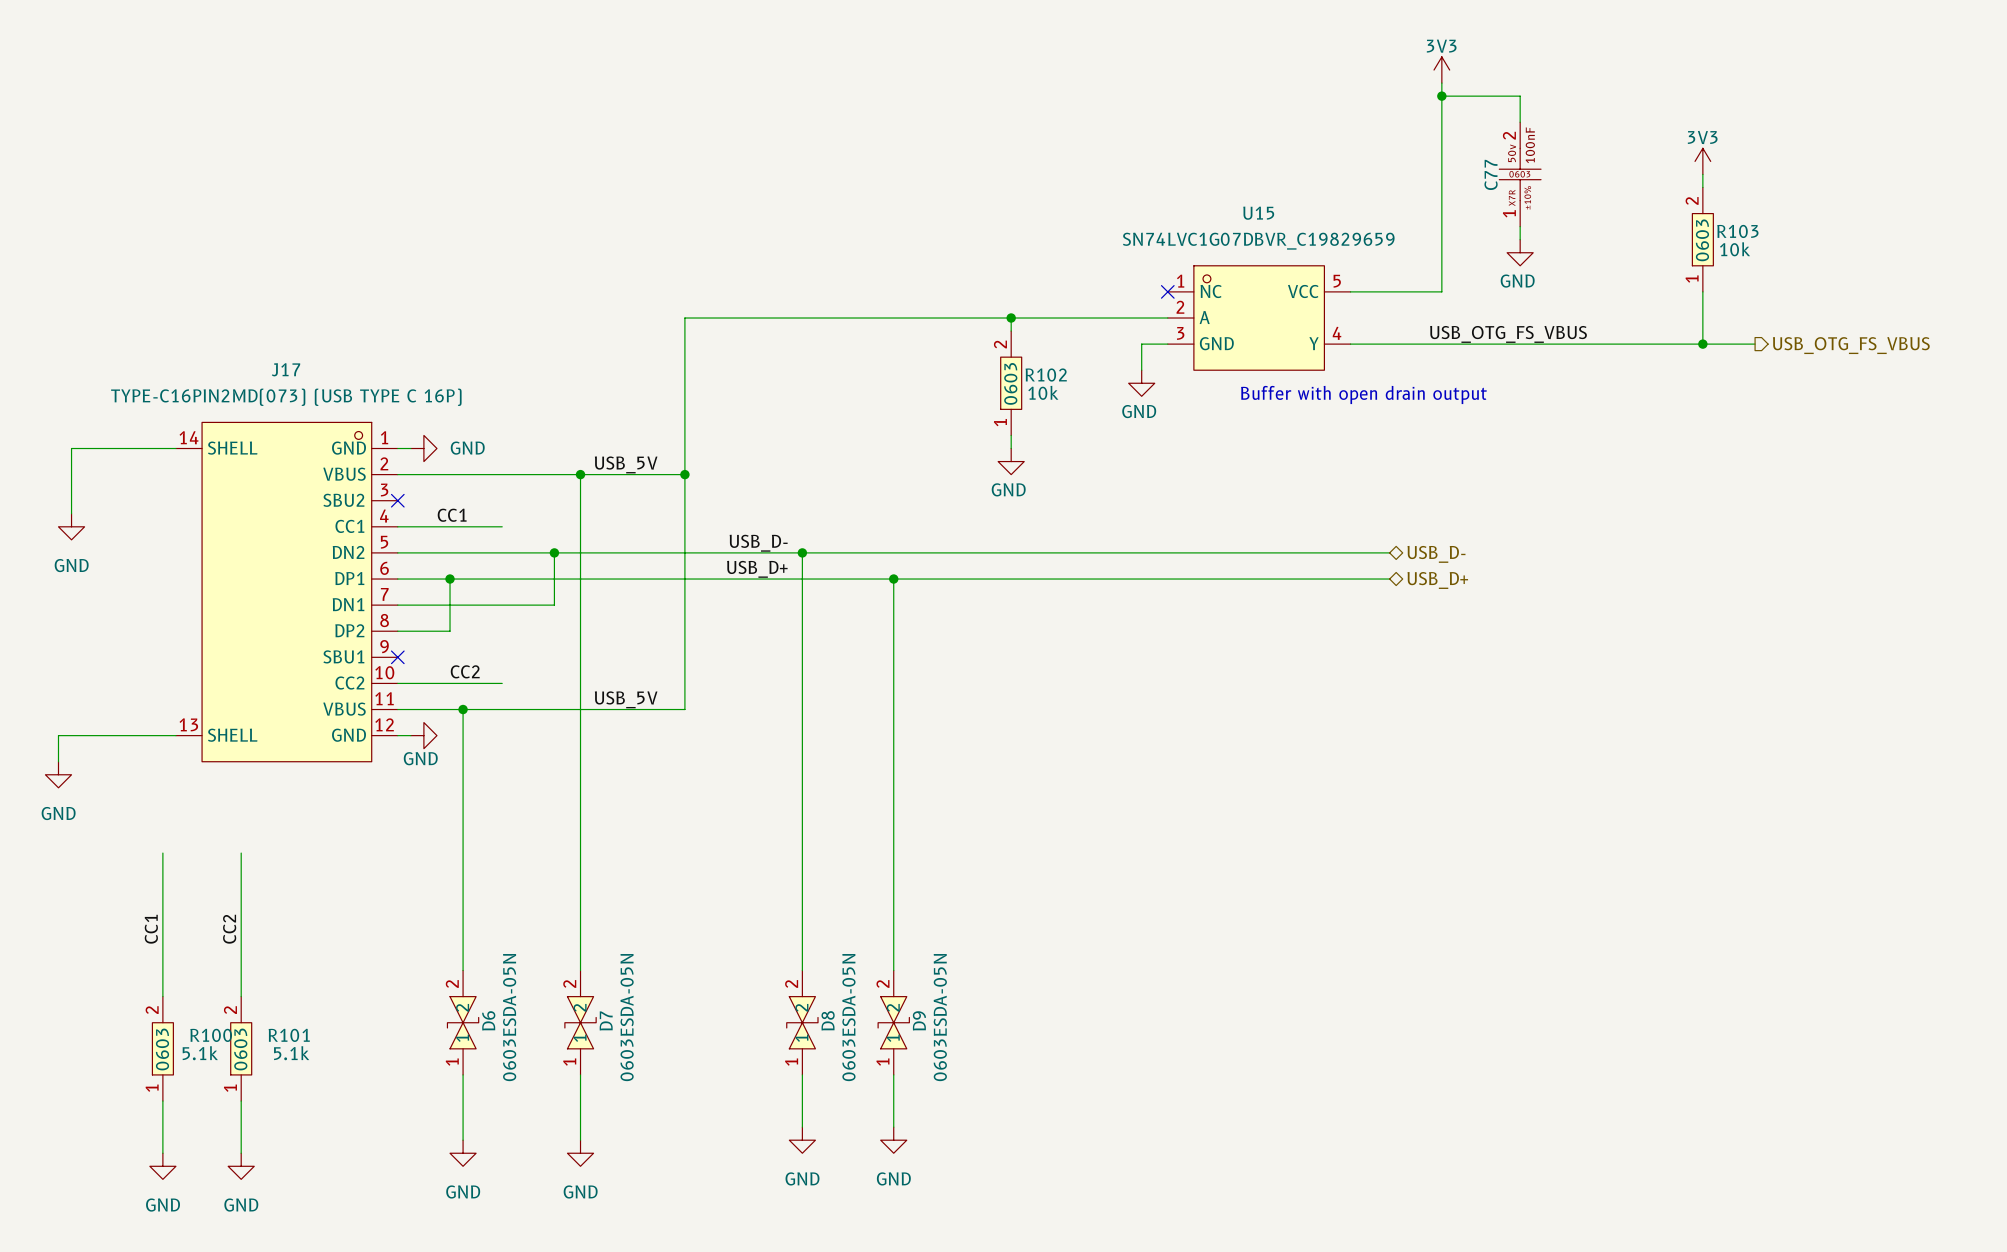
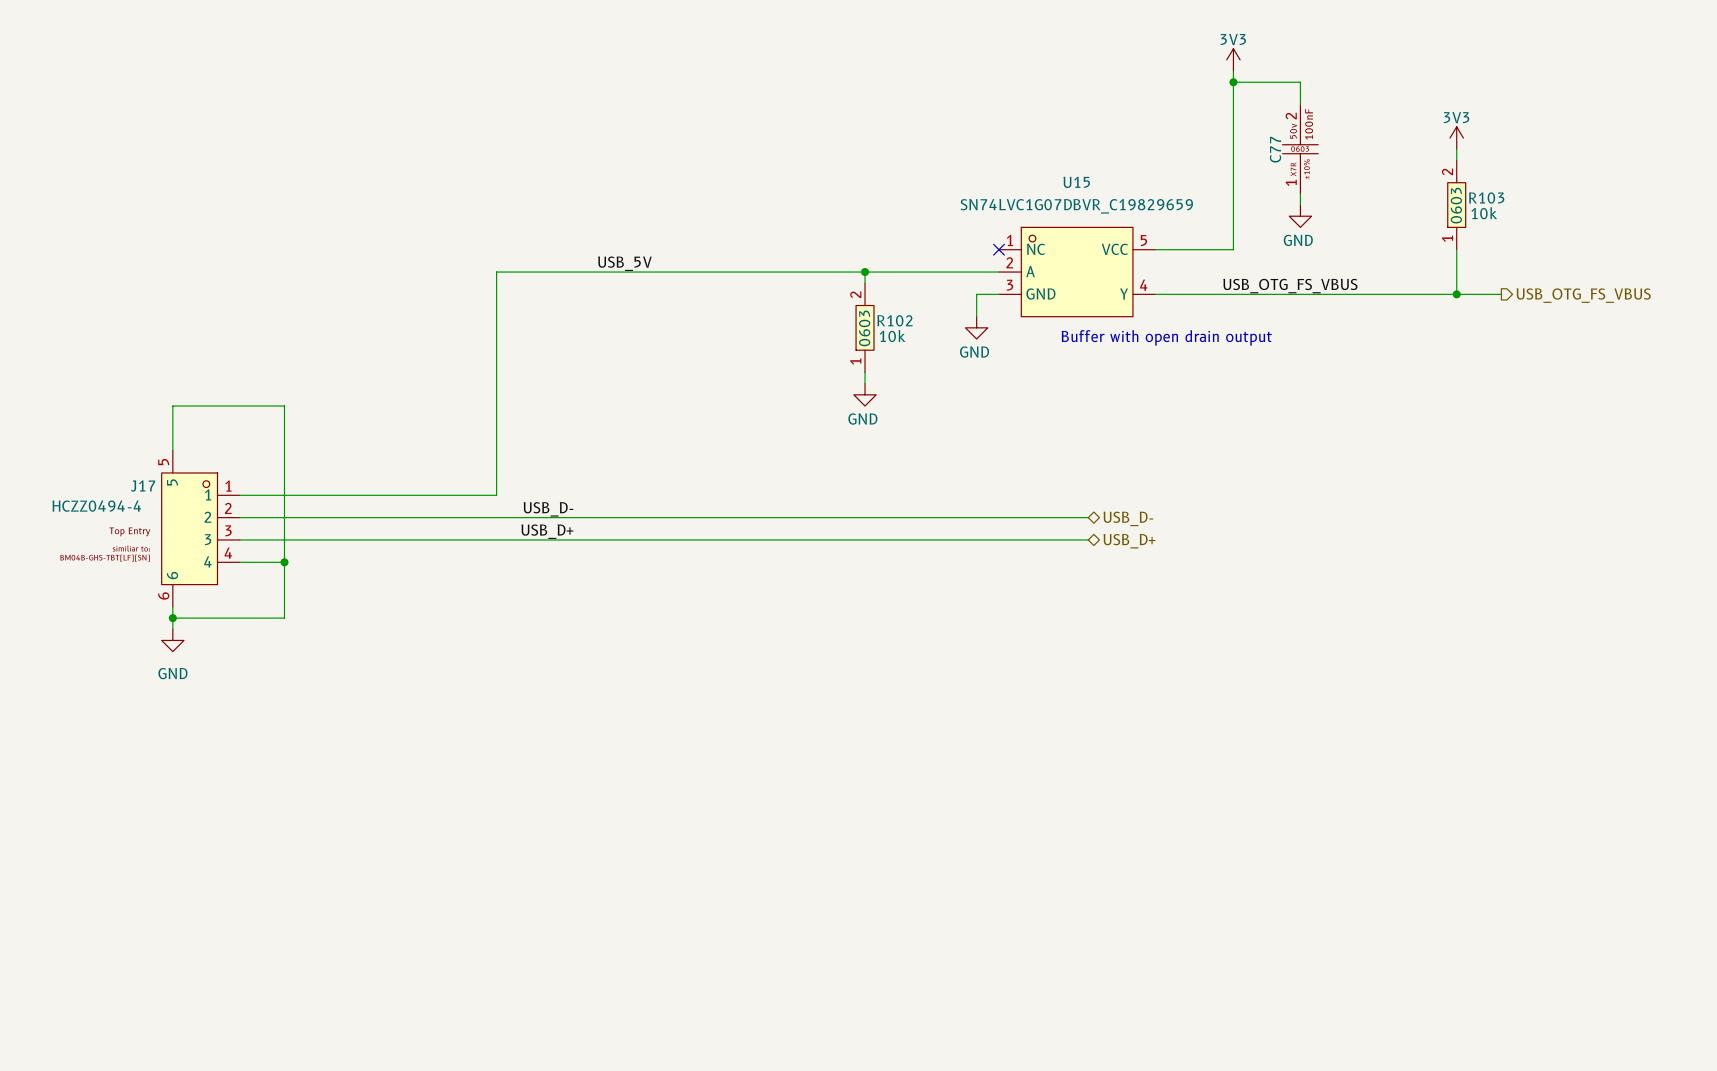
wire: (684, 318) (684, 709) (397, 709) -> (585, 272) (496, 272) (496, 406)
J17 name position: J17 (286, 369) -> J17 (143, 486)
J17 value: TYPE-C16PIN2MD(073) (USB TYPE C 16P) (286, 397) -> HCZZ0494-4 (96, 506)
J17 symbol: [175, 422, 398, 762] -> [161, 450, 240, 607]
wire: (175, 448) (71, 448) (71, 513) -> none
wire: (397, 448) (410, 448) -> none
power symbol: GND (423, 448) -> none
label position: USB_5V (626, 464) -> USB_5V (624, 263)
wire: (397, 474) (684, 474) -> none
junction: (580, 474) -> none
junction: (684, 474) -> none
no-connect mark: (397, 500) -> none
label: CC1 (452, 515) -> none
power symbol: GND (71, 526) -> none
wire: (397, 526) (502, 526) -> none
label position: USB_D- (758, 543) -> USB_D- (548, 509)
wire: (397, 552) (1389, 552) -> none
wire: (554, 552) (554, 605) -> (1088, 517) (474, 517)
junction: (554, 552) -> none
wire: (802, 552) (802, 970) -> none
junction: (802, 552) -> none
hierarchical label position: USB_D- (1436, 554) -> USB_D- (1128, 518)
label position: USB_D+ (757, 569) -> USB_D+ (547, 531)
wire: (450, 579) (450, 631) -> (1088, 539) (384, 539)
junction: (450, 579) -> none
wire: (893, 579) (893, 970) -> none
junction: (893, 579) -> none
wire: (1389, 579) (580, 579) (580, 970) -> none
hierarchical label position: USB_D+ (1437, 580) -> USB_D+ (1129, 541)
junction: none -> (284, 562)
no-connect mark: (397, 657) -> none
label: CC2 (465, 671) -> none
wire: (397, 683) (502, 683) -> none
label: USB_5V (626, 699) -> none
wire: (463, 709) (463, 970) -> none
junction: (463, 709) -> none
junction: none -> (172, 618)
wire: (175, 735) (58, 735) (58, 761) -> none
wire: (397, 735) (410, 735) -> none
power symbol: GND (423, 735) -> none
power symbol: none -> GND (172, 640)
power symbol: GND (58, 774) -> none
wire: (162, 853) (162, 996) -> none
wire: (241, 853) (241, 996) -> none
label: CC1 (151, 929) -> none
label: CC2 (229, 929) -> none
D6: 0603ESDA-05N (463, 1022) -> none
D7: 0603ESDA-05N (580, 1022) -> none
D8: 0603ESDA-05N (802, 1022) -> none
D9: 0603ESDA-05N (893, 1022) -> none
R100: (162, 1048) -> none
R101: (241, 1048) -> none
wire: (463, 1074) (463, 1140) -> none
wire: (580, 1074) (580, 1140) -> none
wire: (802, 1074) (802, 1127) -> none
wire: (893, 1074) (893, 1127) -> none
wire: (162, 1101) (162, 1153) -> none
wire: (241, 1101) (241, 1153) -> none
power symbol: GND (802, 1140) -> none
power symbol: GND (893, 1140) -> none
power symbol: GND (463, 1153) -> none
power symbol: GND (580, 1153) -> none
power symbol: GND (162, 1166) -> none
power symbol: GND (241, 1166) -> none

